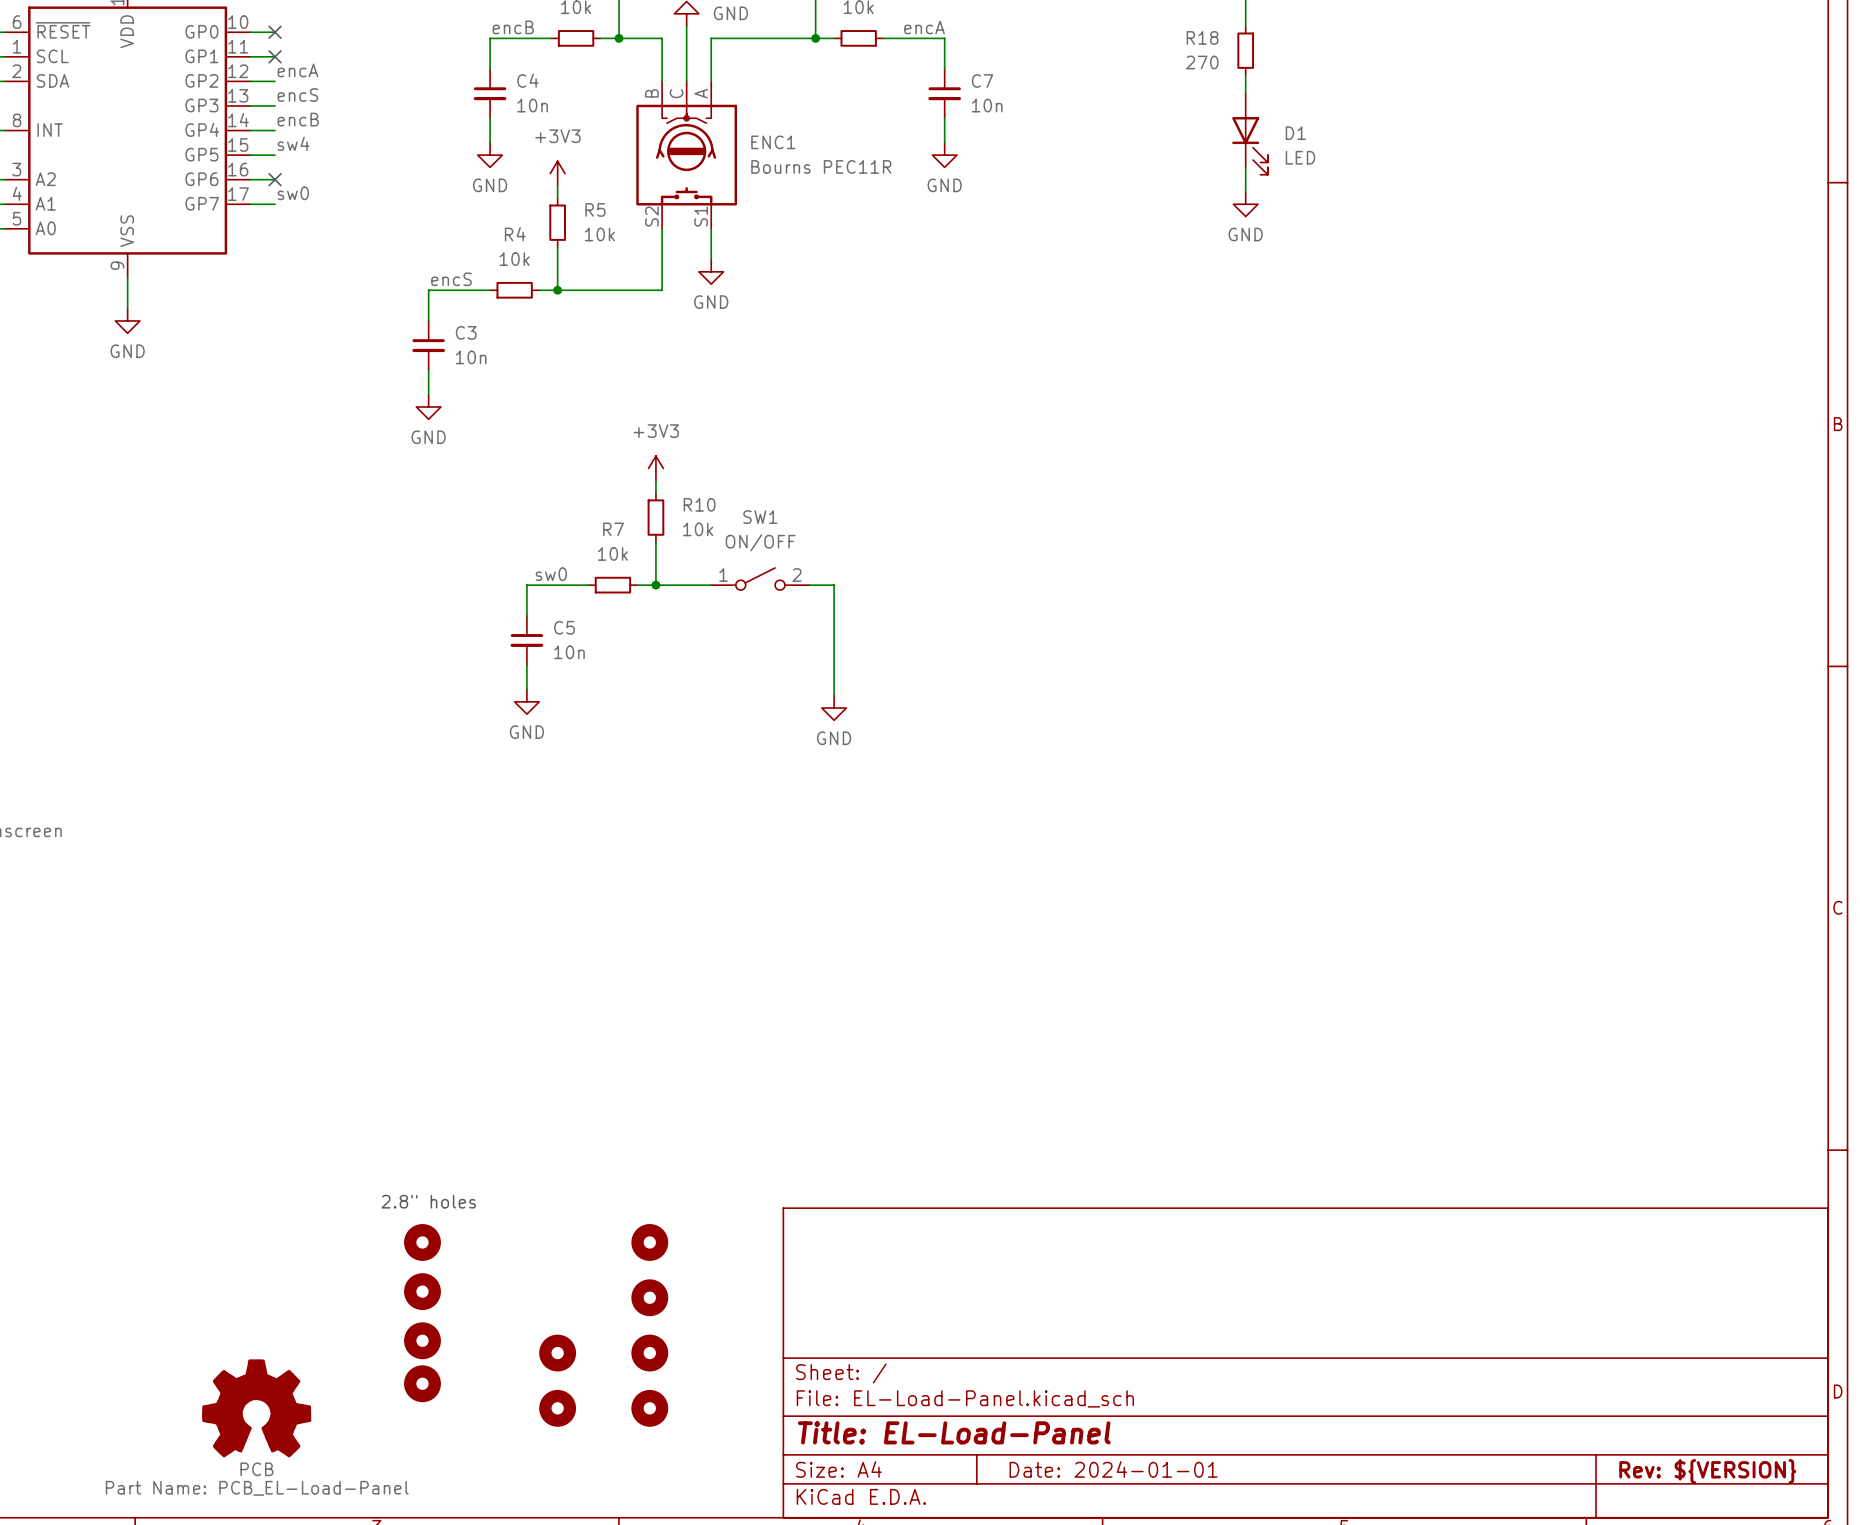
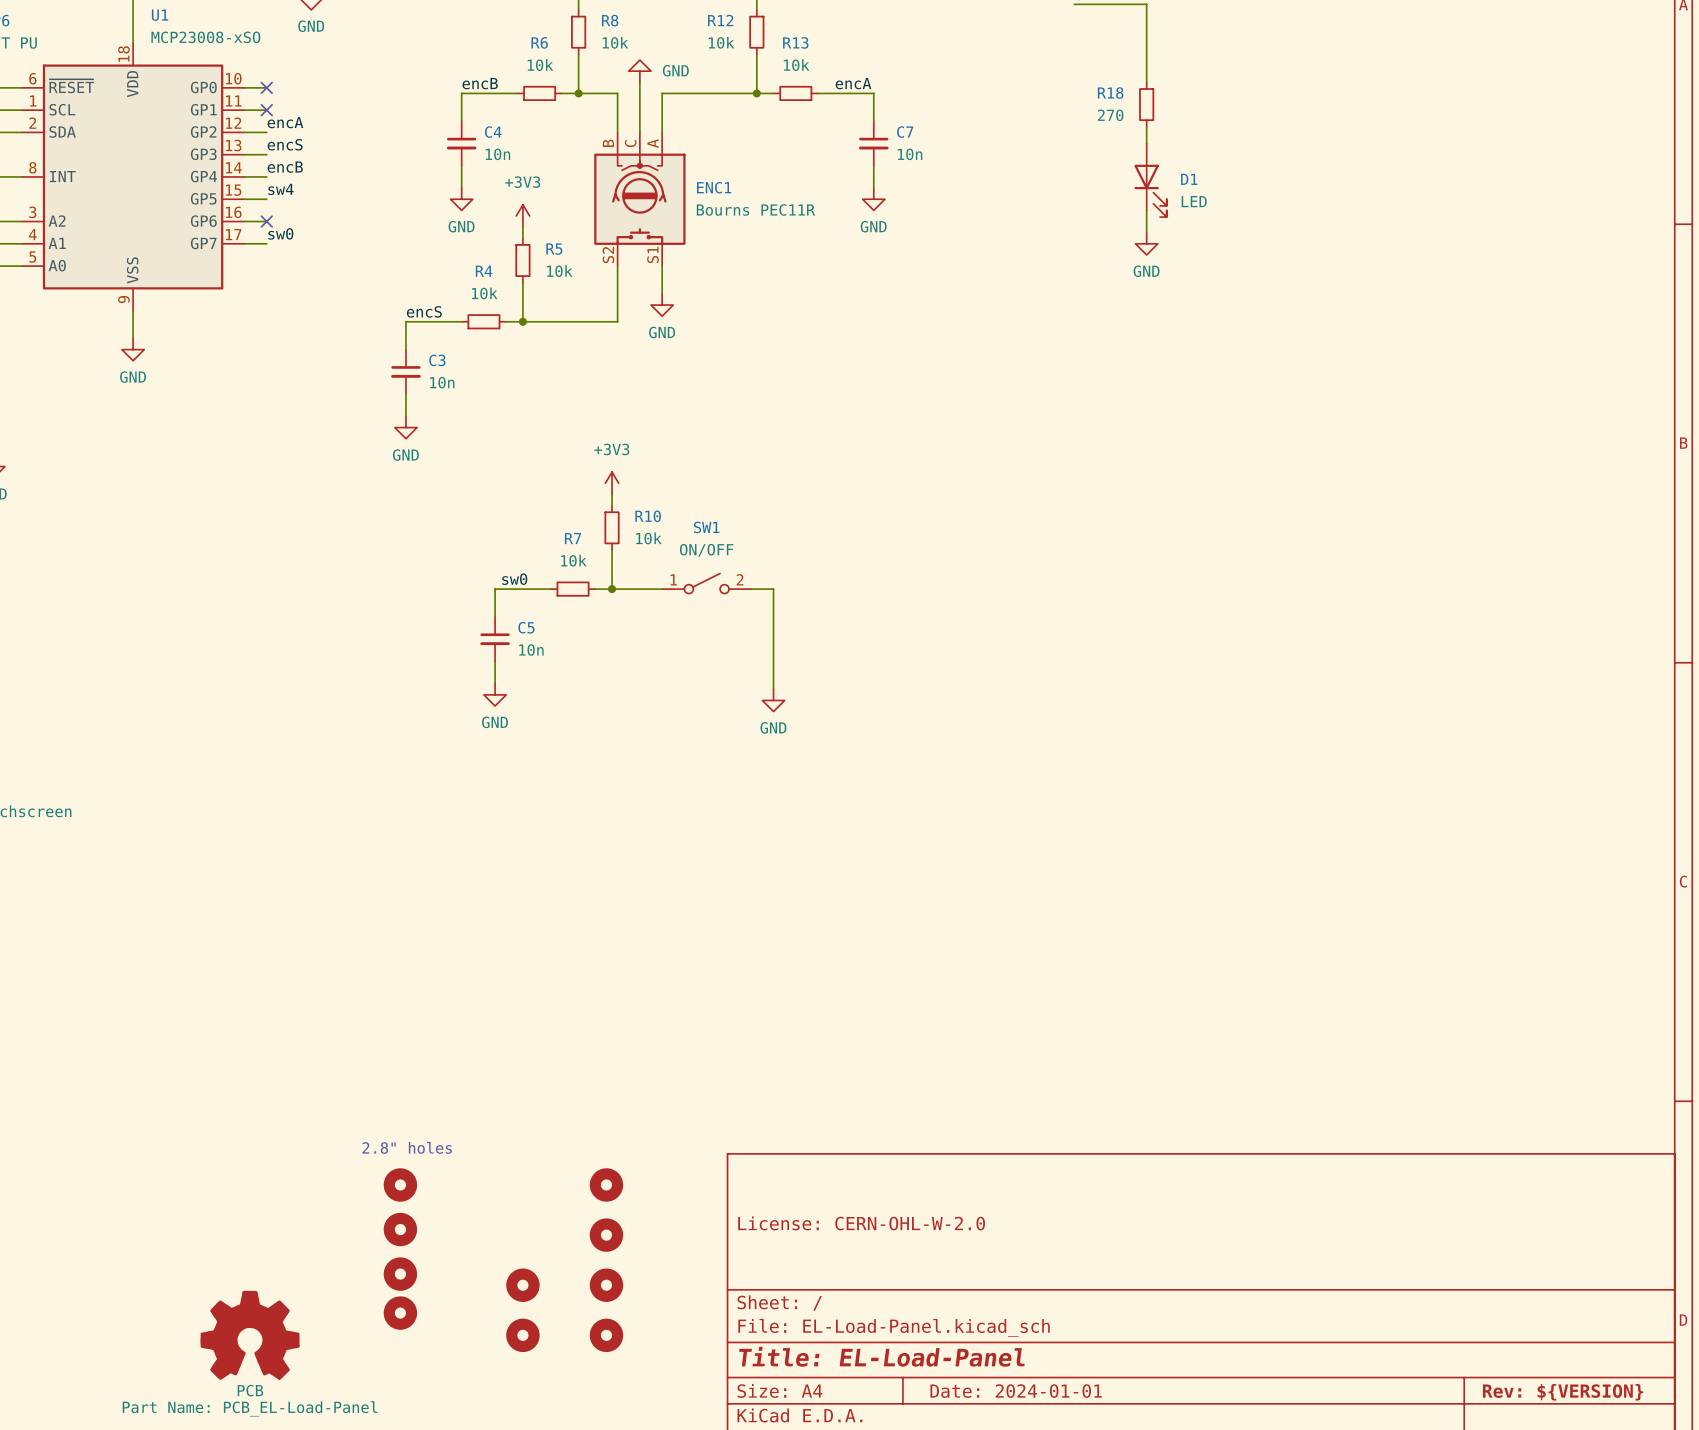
title block: none -> License: CERN-OHL-W-2.0 (861, 1223)

